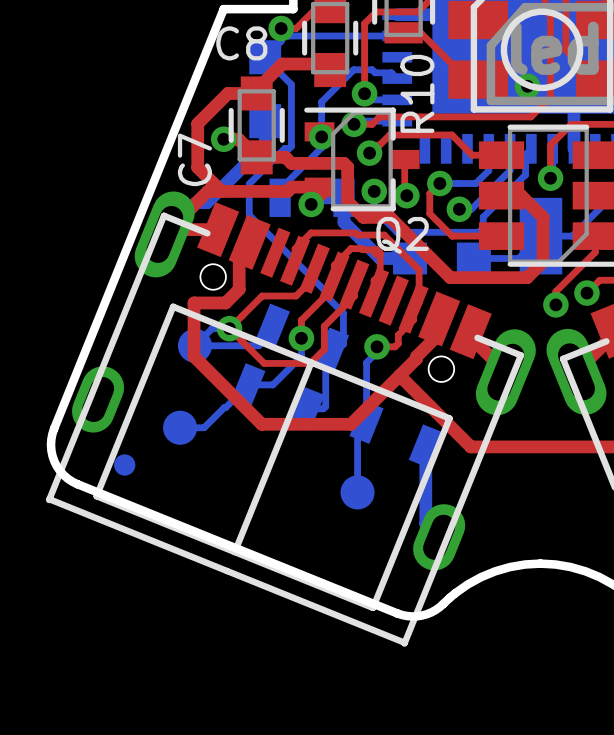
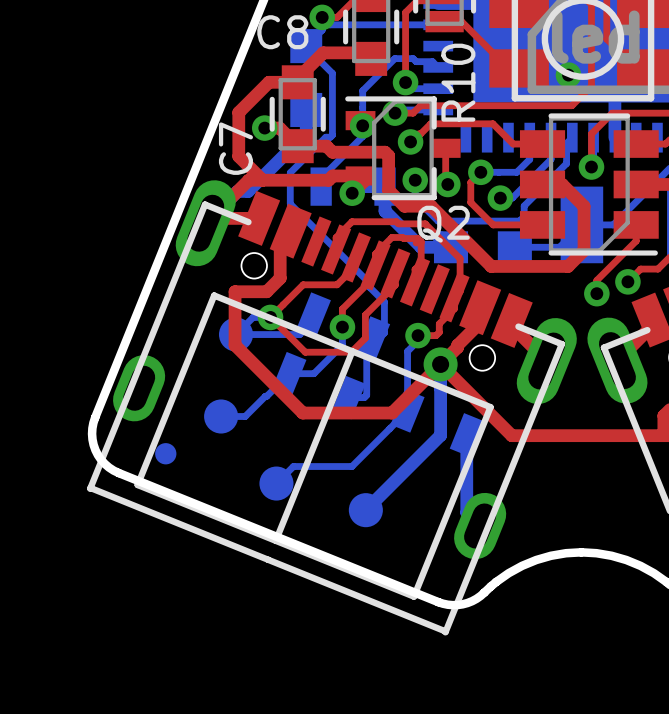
bottom track: none -> (440, 364) (440, 435) (365, 510)
via: none -> (440, 364)
bottom track: (357, 431) (357, 492) -> (398, 419) (351, 466) (293, 466) (276, 483)
part position: (357, 492) -> (365, 510)
part: none -> (276, 483)

